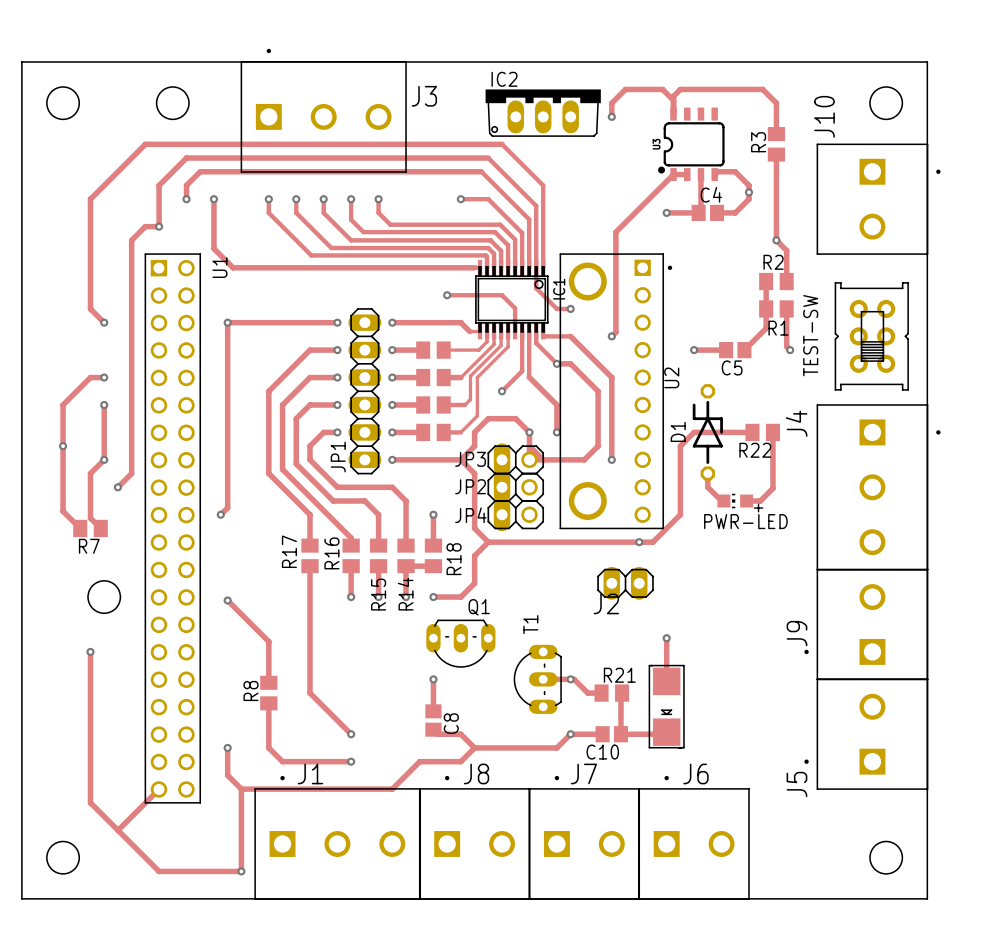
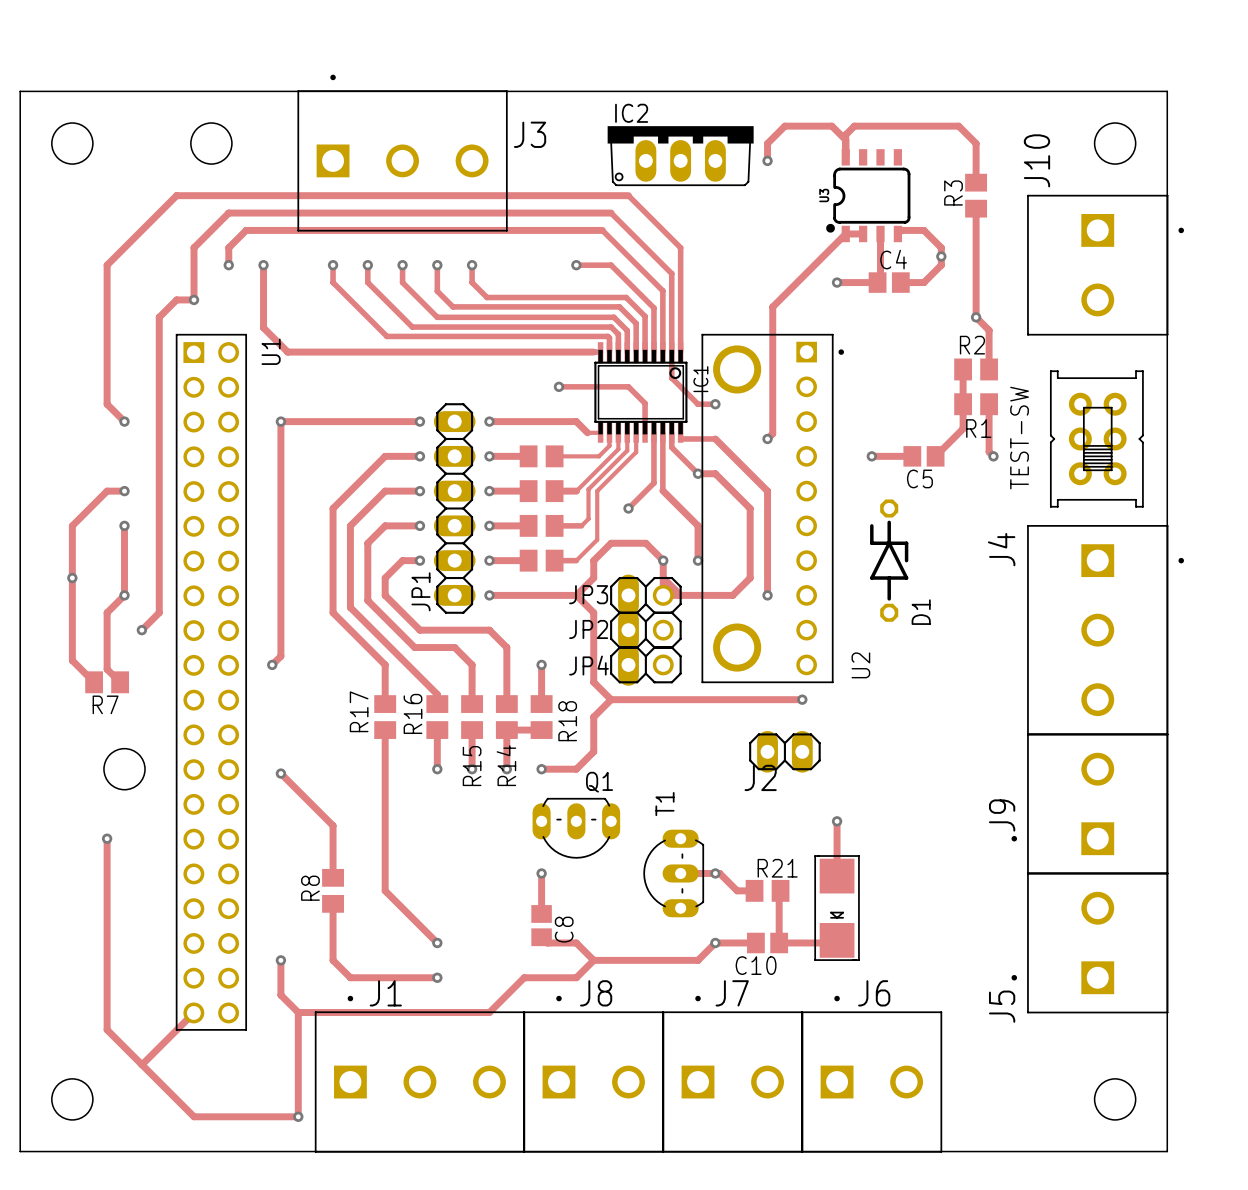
U2 name position: U2 (671, 377) -> U2 (860, 665)
D1 name position: D1 (678, 431) -> D1 (921, 612)
track: (752, 432) (694, 432) (680, 446) (680, 514) (652, 542) (639, 542) -> none
R22: (762, 432) -> none
track: (772, 432) (772, 488) (760, 501) (746, 501) -> none
track: (707, 473) (707, 487) (721, 501) (723, 501) -> none
PWR-LED: (735, 501) -> none

